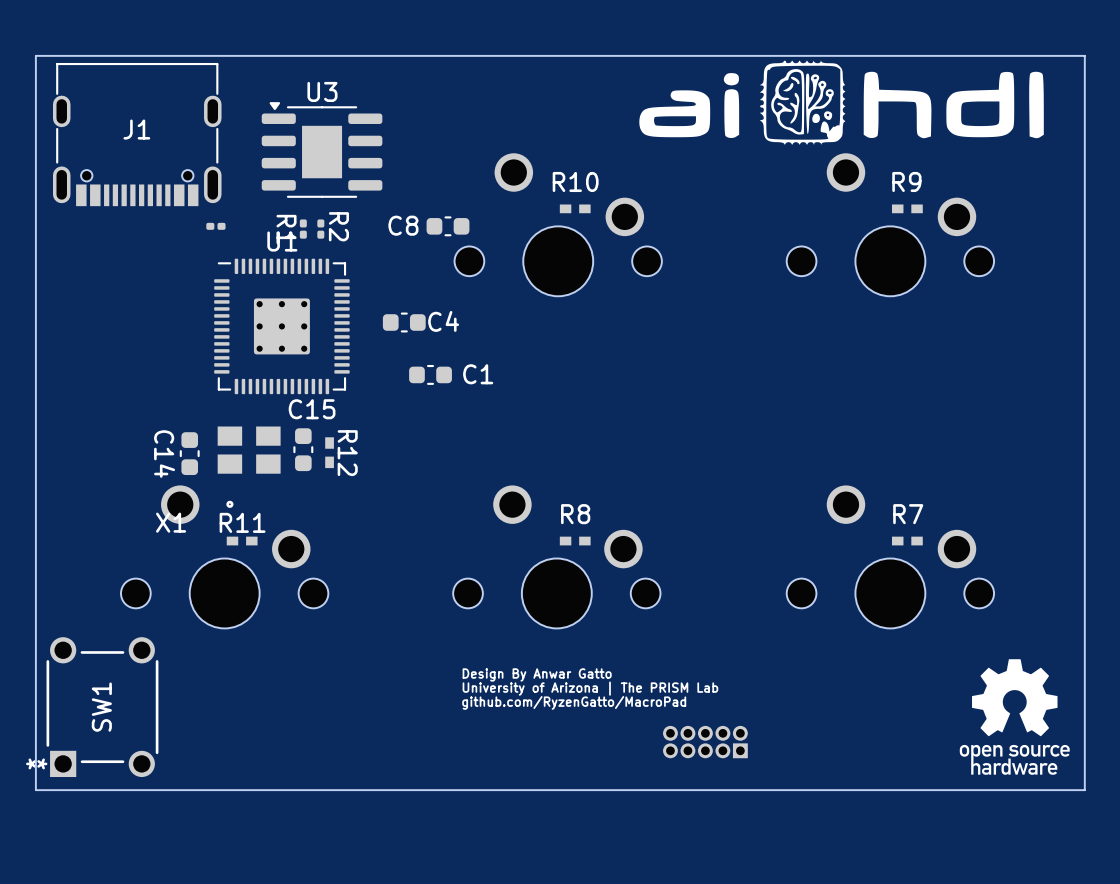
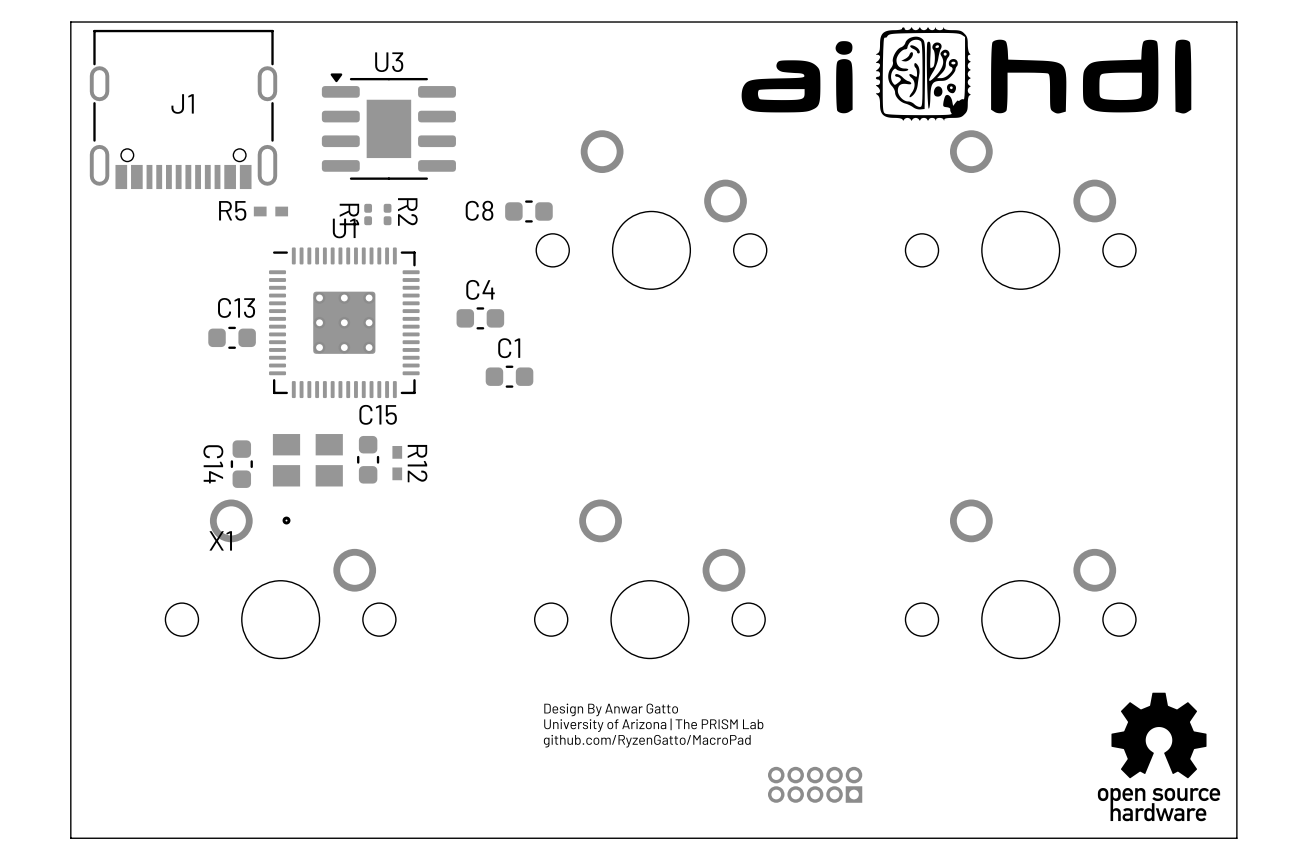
R10: (575, 208) -> none
R9: (907, 208) -> none
part: (215, 226) -> none
R5: none -> (270, 211)
C4 name position: C4 (443, 321) -> C4 (480, 289)
C13: none -> (232, 337)
C1 name position: C1 (478, 374) -> C1 (509, 348)
R11: (242, 541) -> none
R8: (575, 541) -> none
R7: (907, 541) -> none
SW1: (102, 707) -> none

